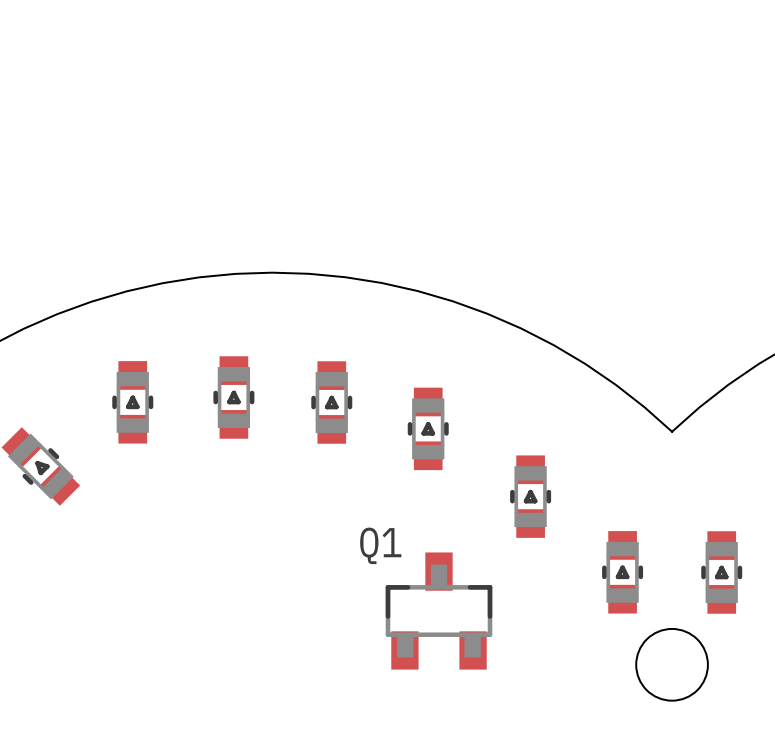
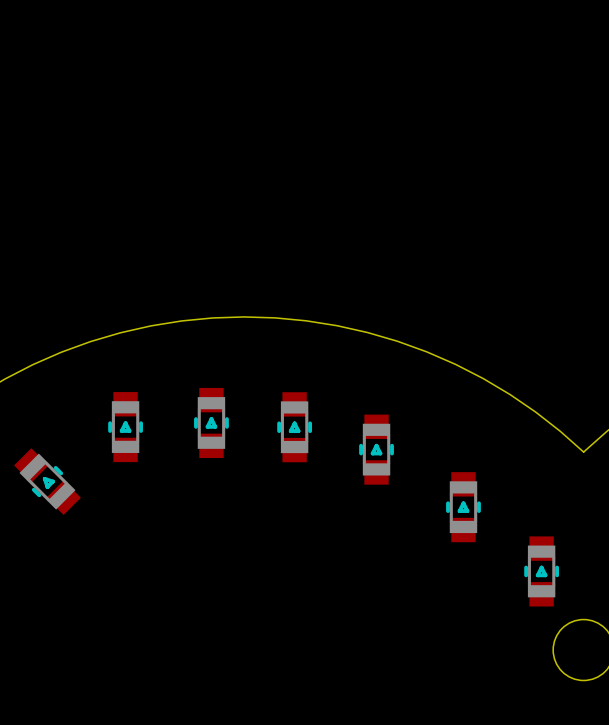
Q1: (438, 611) -> none

